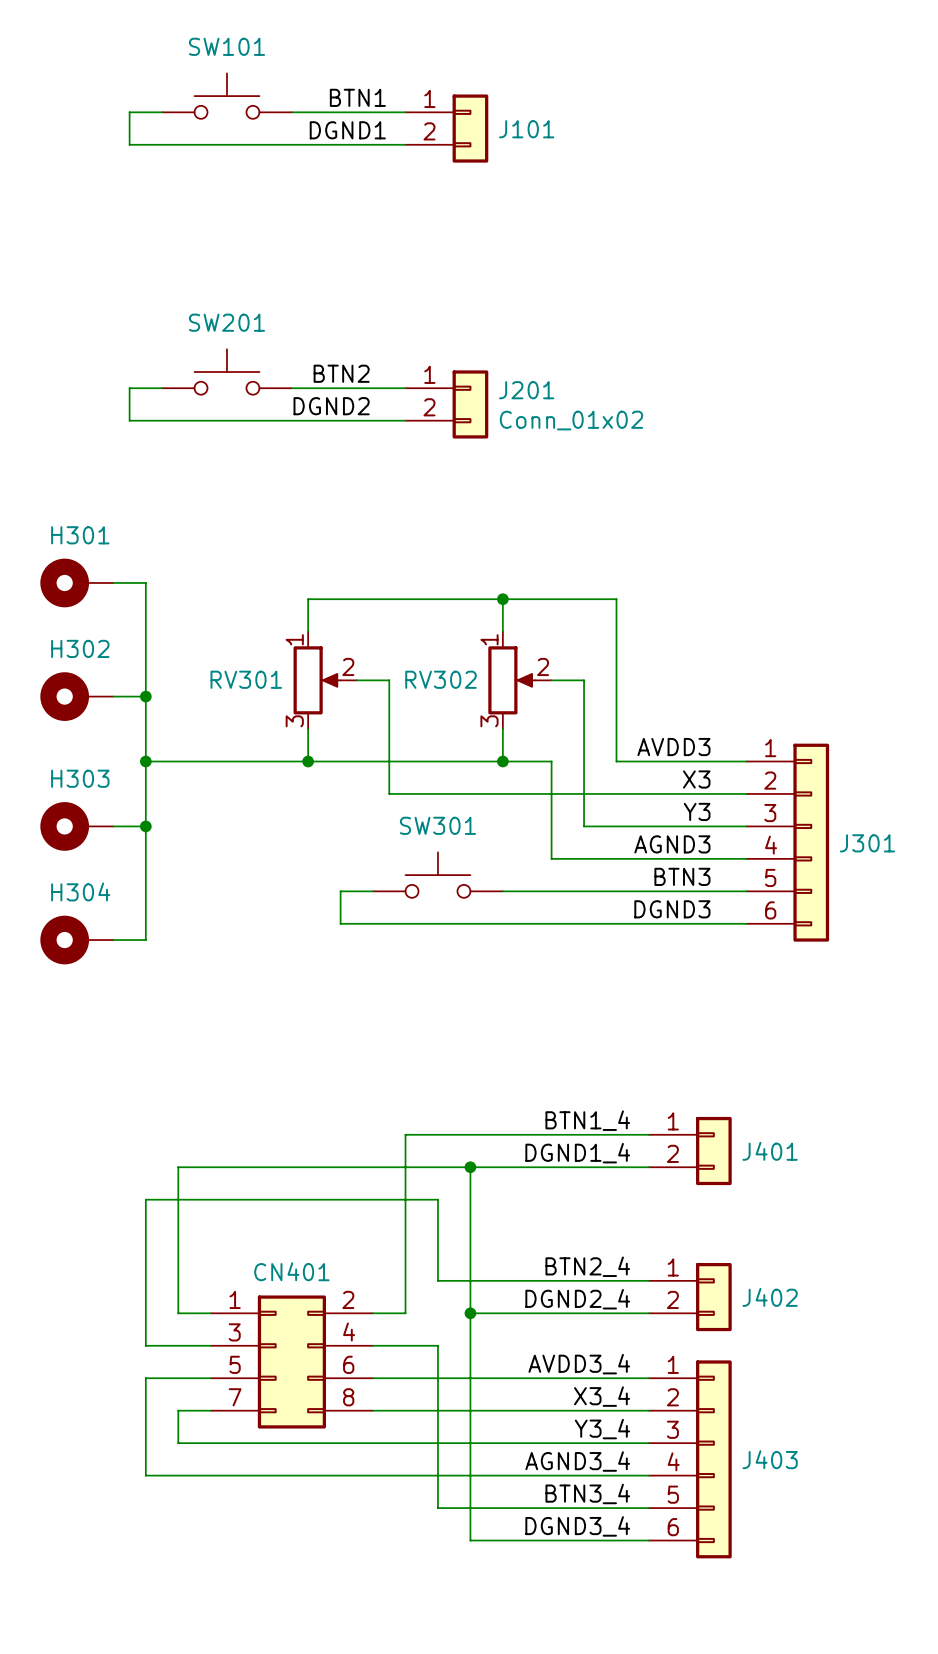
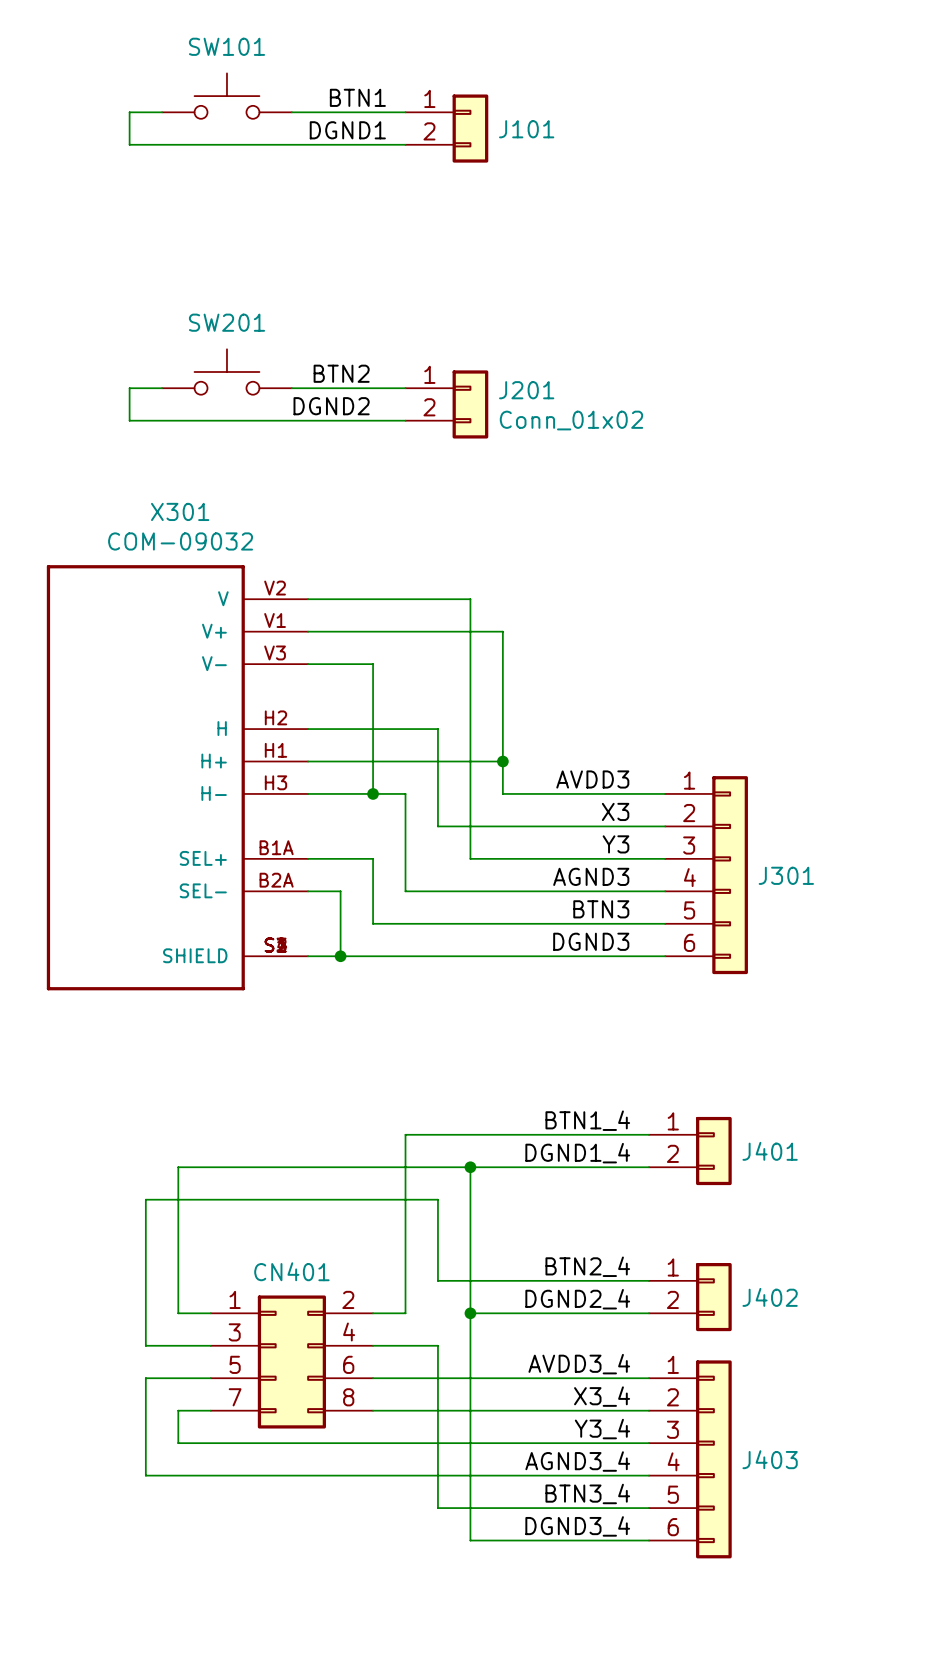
H301: (76, 582) -> none
wire: (113, 582) (145, 582) (145, 940) (113, 940) -> none
wire: (308, 599) (308, 631) -> (502, 729) (502, 631) (308, 631)
wire: (470, 599) (616, 599) (616, 761) (746, 761) -> (470, 599) (470, 858) (551, 858)
wire: (502, 599) (502, 631) -> none
junction: (502, 599) -> none
wire: none -> (308, 664) (373, 664) (373, 793)
RV301: (325, 680) -> none
wire: (356, 680) (389, 680) (389, 793) -> (308, 793) (389, 793)
RV302: (519, 680) -> none
wire: (551, 680) (584, 680) (584, 826) -> (308, 729) (437, 729) (437, 826) (584, 826)
H302: (76, 696) -> none
wire: (113, 696) (145, 696) -> none
junction: (145, 696) -> none
wire: (308, 729) (308, 761) (145, 761) -> none
label position: AVDD3 (673, 747) -> AVDD3 (592, 779)
junction: (145, 761) -> none
junction position: (308, 761) -> (373, 793)
wire: (502, 761) (551, 761) (551, 858) -> (502, 761) (502, 793)
X301: none -> COM-09032 (177, 777)
label position: X3 (696, 779) -> X3 (615, 811)
wire: (405, 793) (502, 793) -> (405, 793) (405, 891) (502, 891)
label position: Y3 (697, 811) -> Y3 (615, 844)
H303: (76, 826) -> none
wire: (113, 826) (145, 826) -> none
junction: (145, 826) -> none
J301 position: (787, 842) -> (706, 875)
label position: AGND3 (672, 844) -> AGND3 (591, 876)
wire: none -> (308, 858) (373, 858) (373, 923)
SW301: (437, 875) -> none
label position: BTN3 (682, 876) -> BTN3 (601, 909)
wire: (340, 891) (373, 891) -> (340, 891) (308, 891)
label position: DGND3 (672, 909) -> DGND3 (591, 941)
wire: (340, 923) (373, 923) -> (340, 923) (340, 956)
H304: (76, 940) -> none
wire: none -> (308, 956) (665, 956)
junction: none -> (340, 956)

